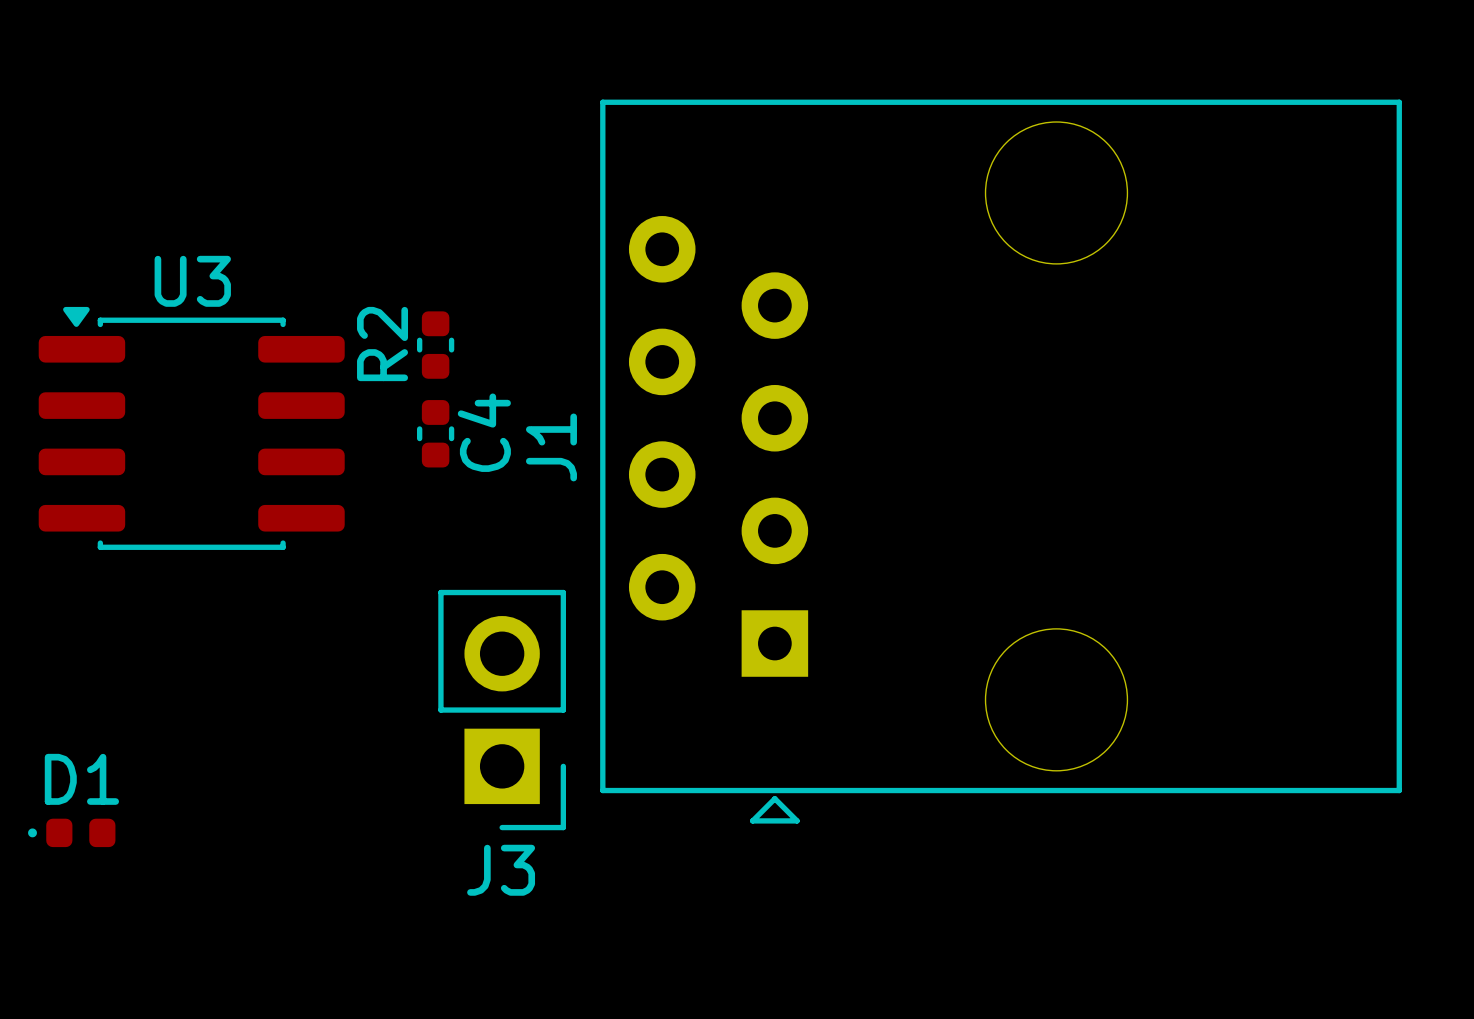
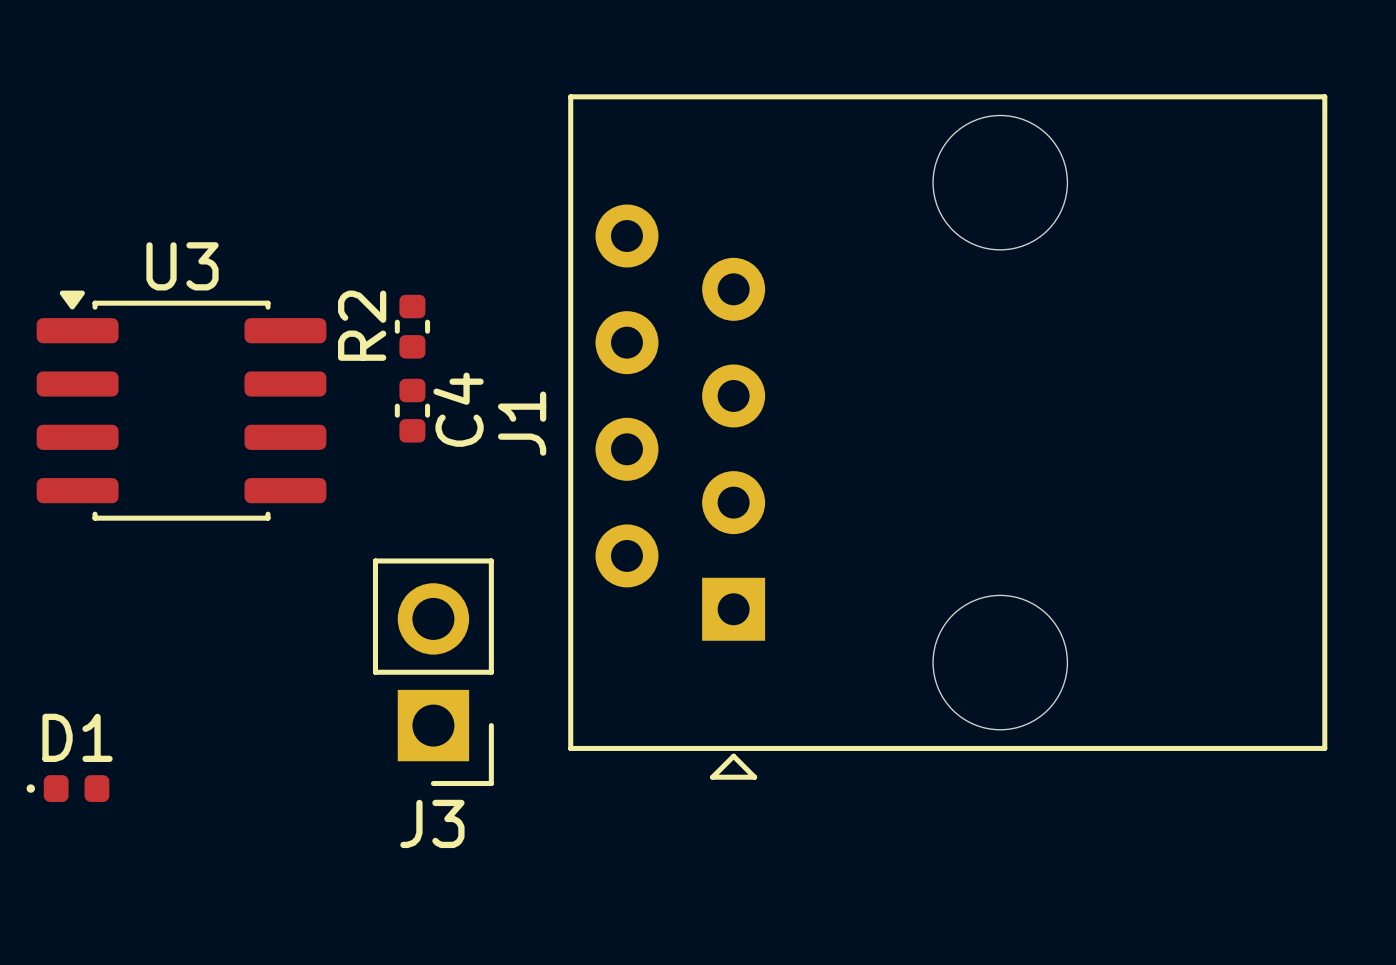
J3 position: (502, 710) -> (433, 672)

